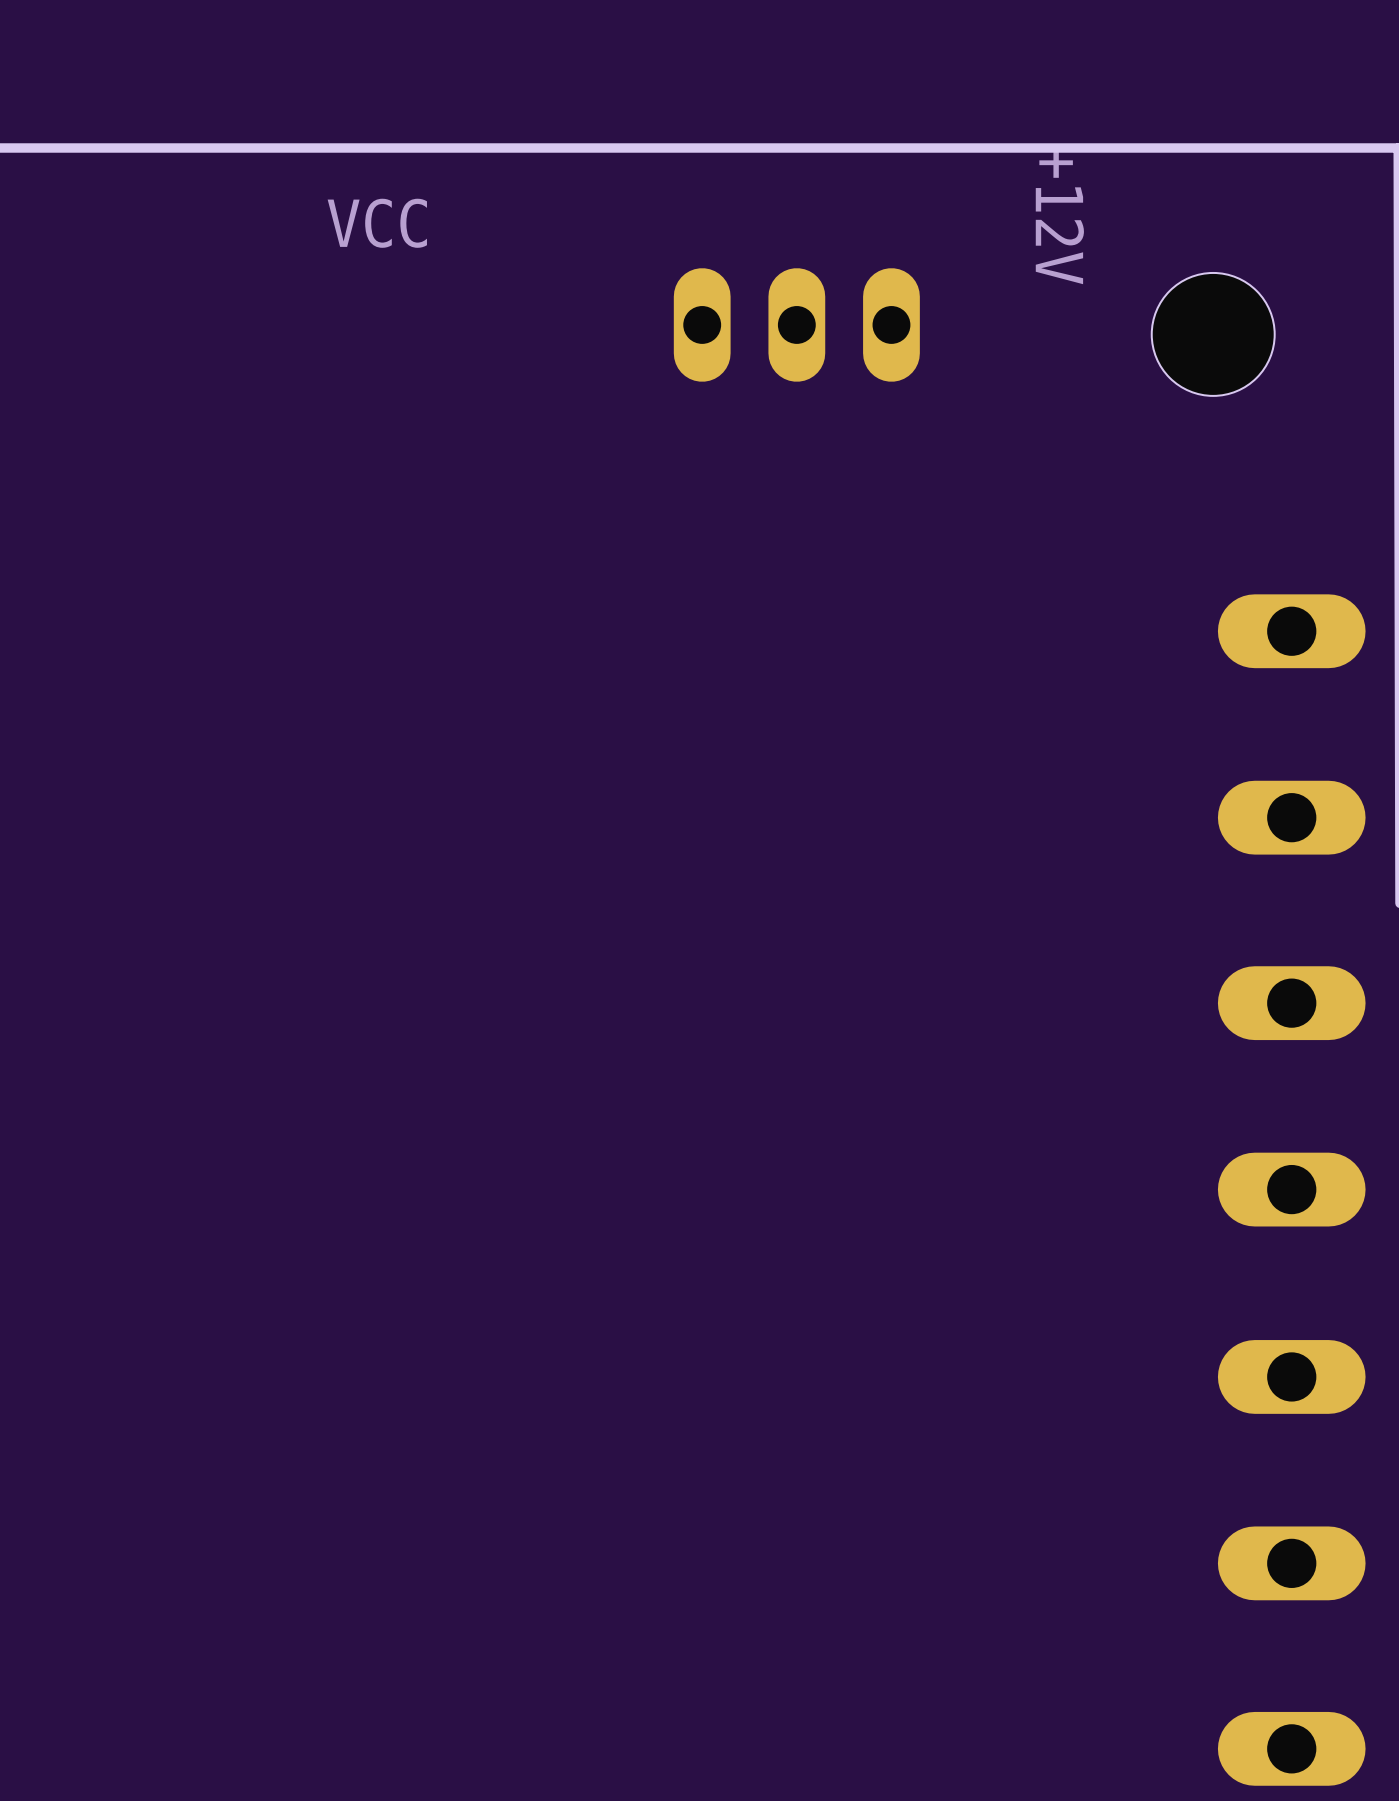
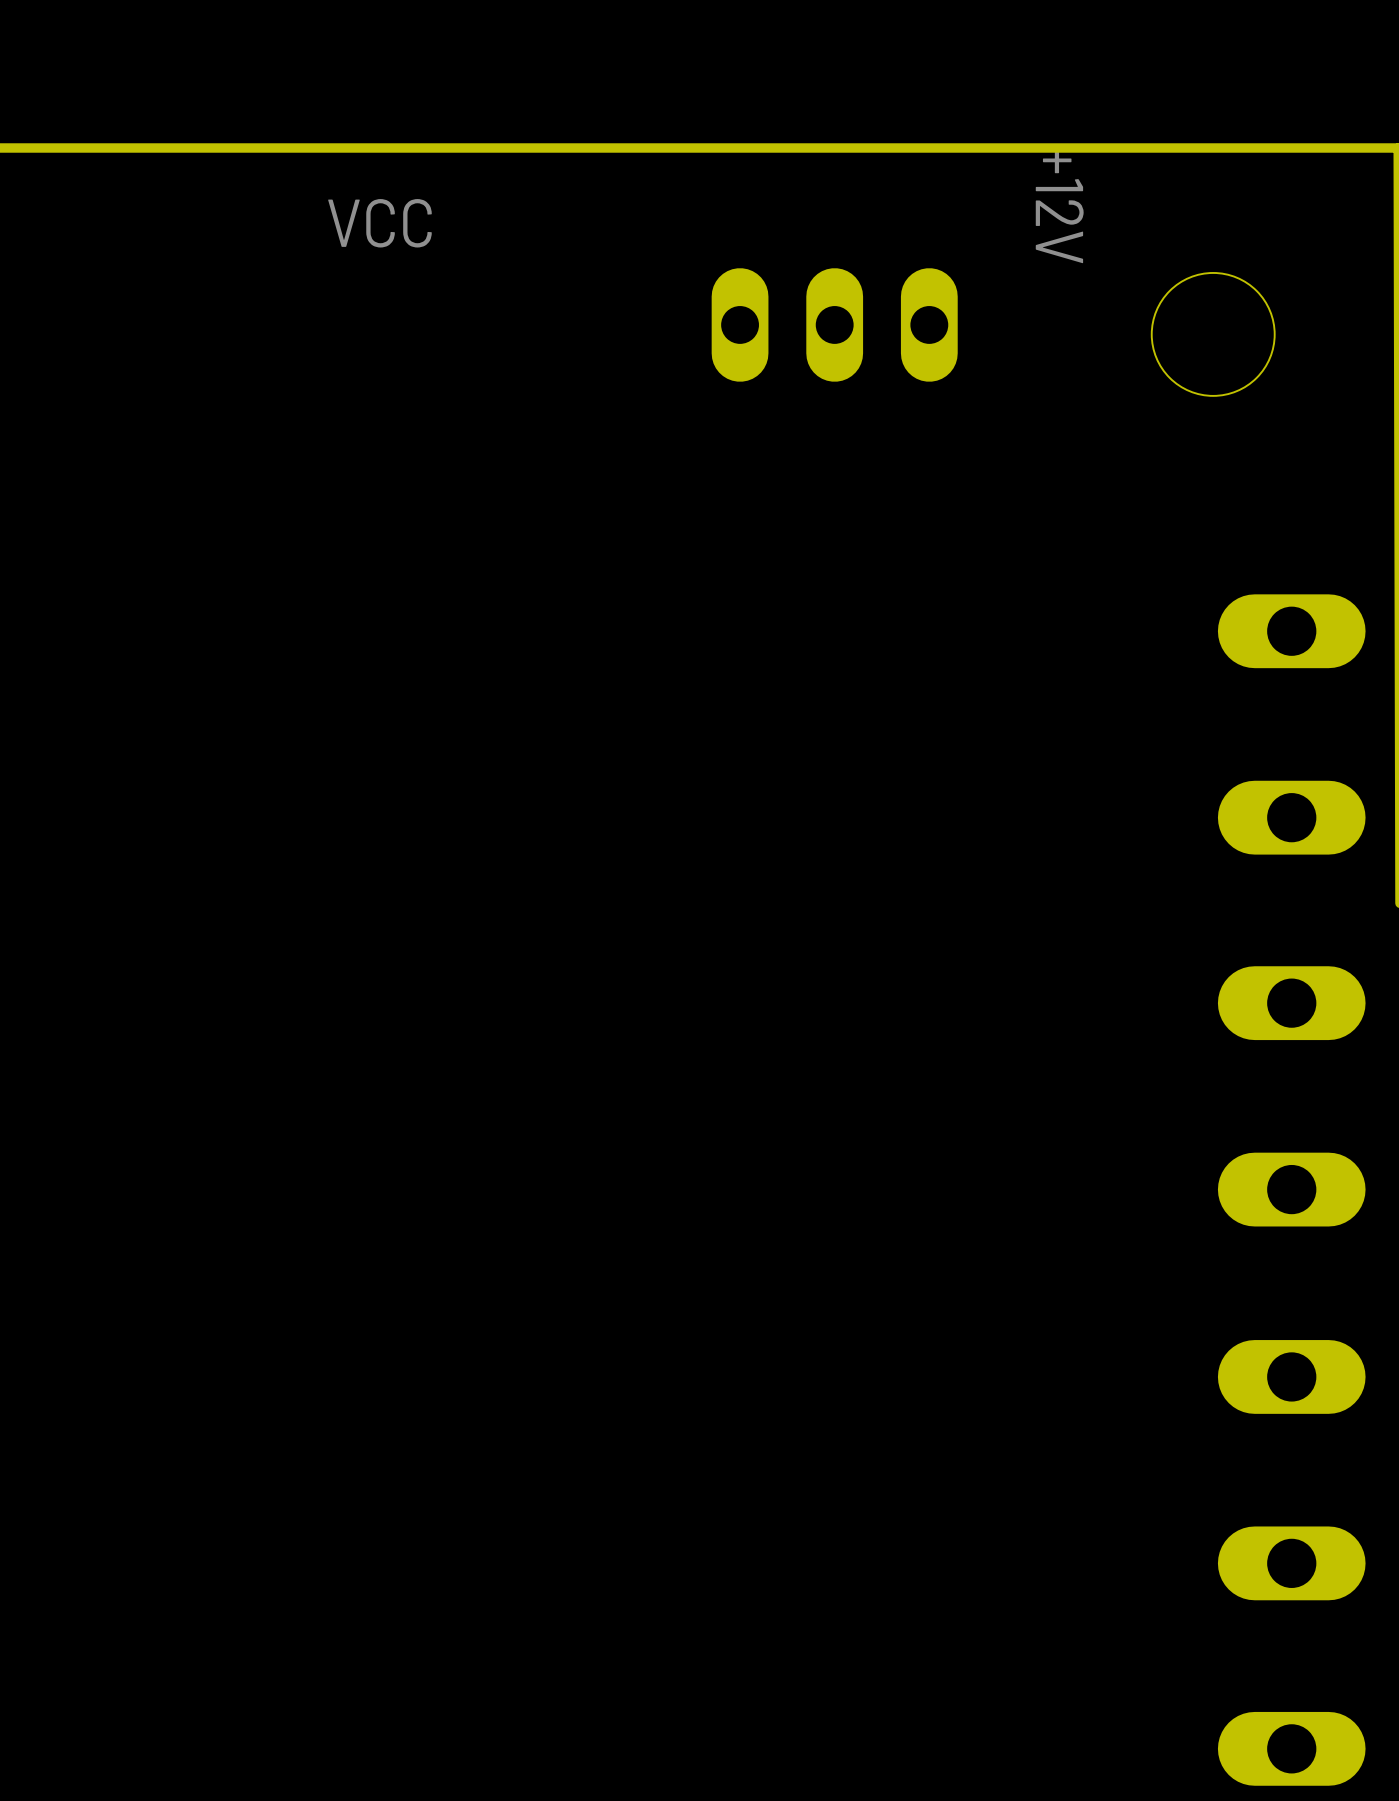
part position: (796, 324) -> (834, 324)

